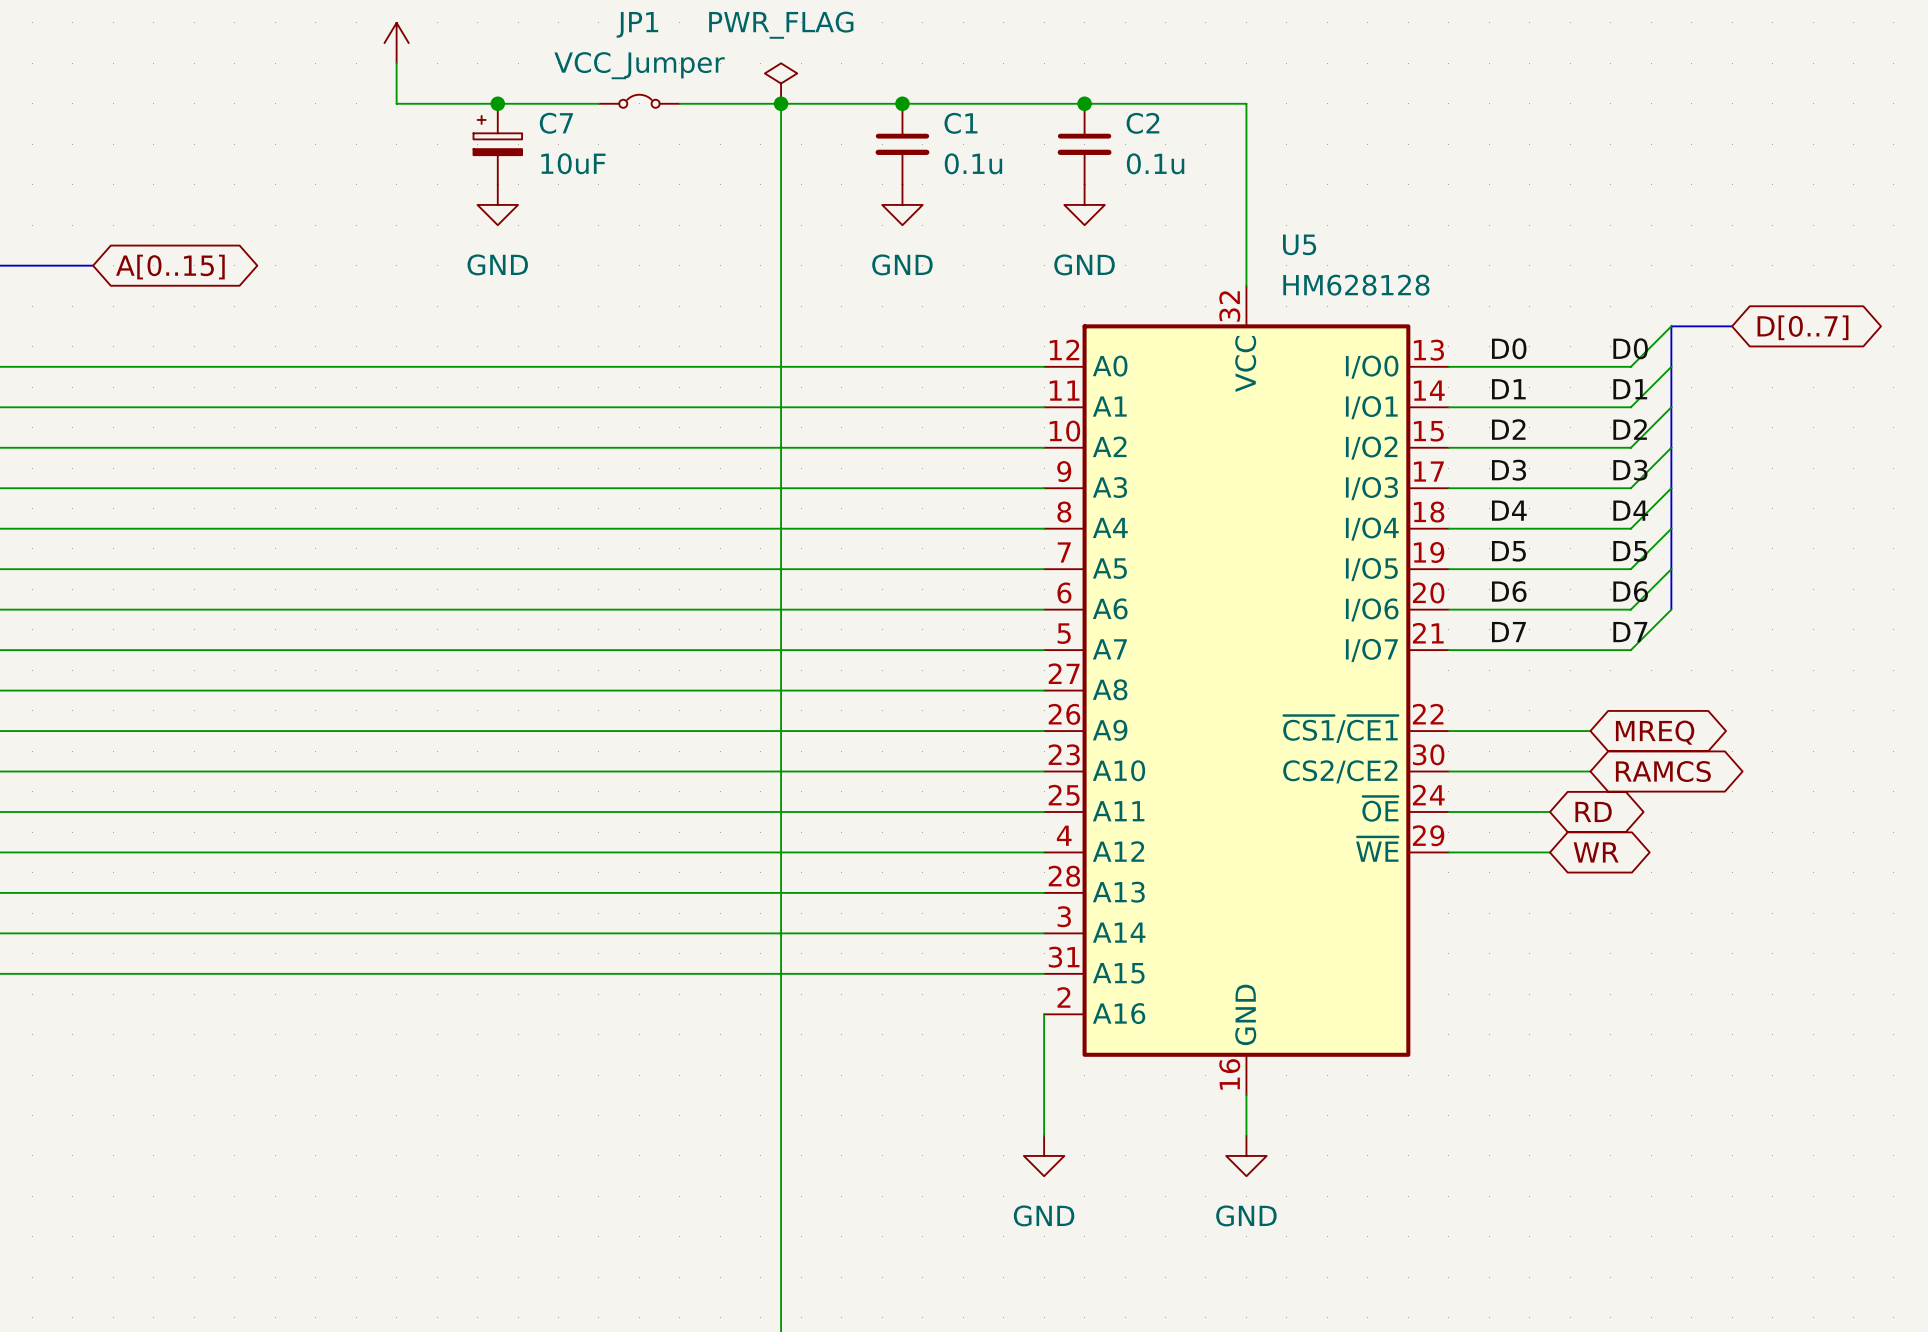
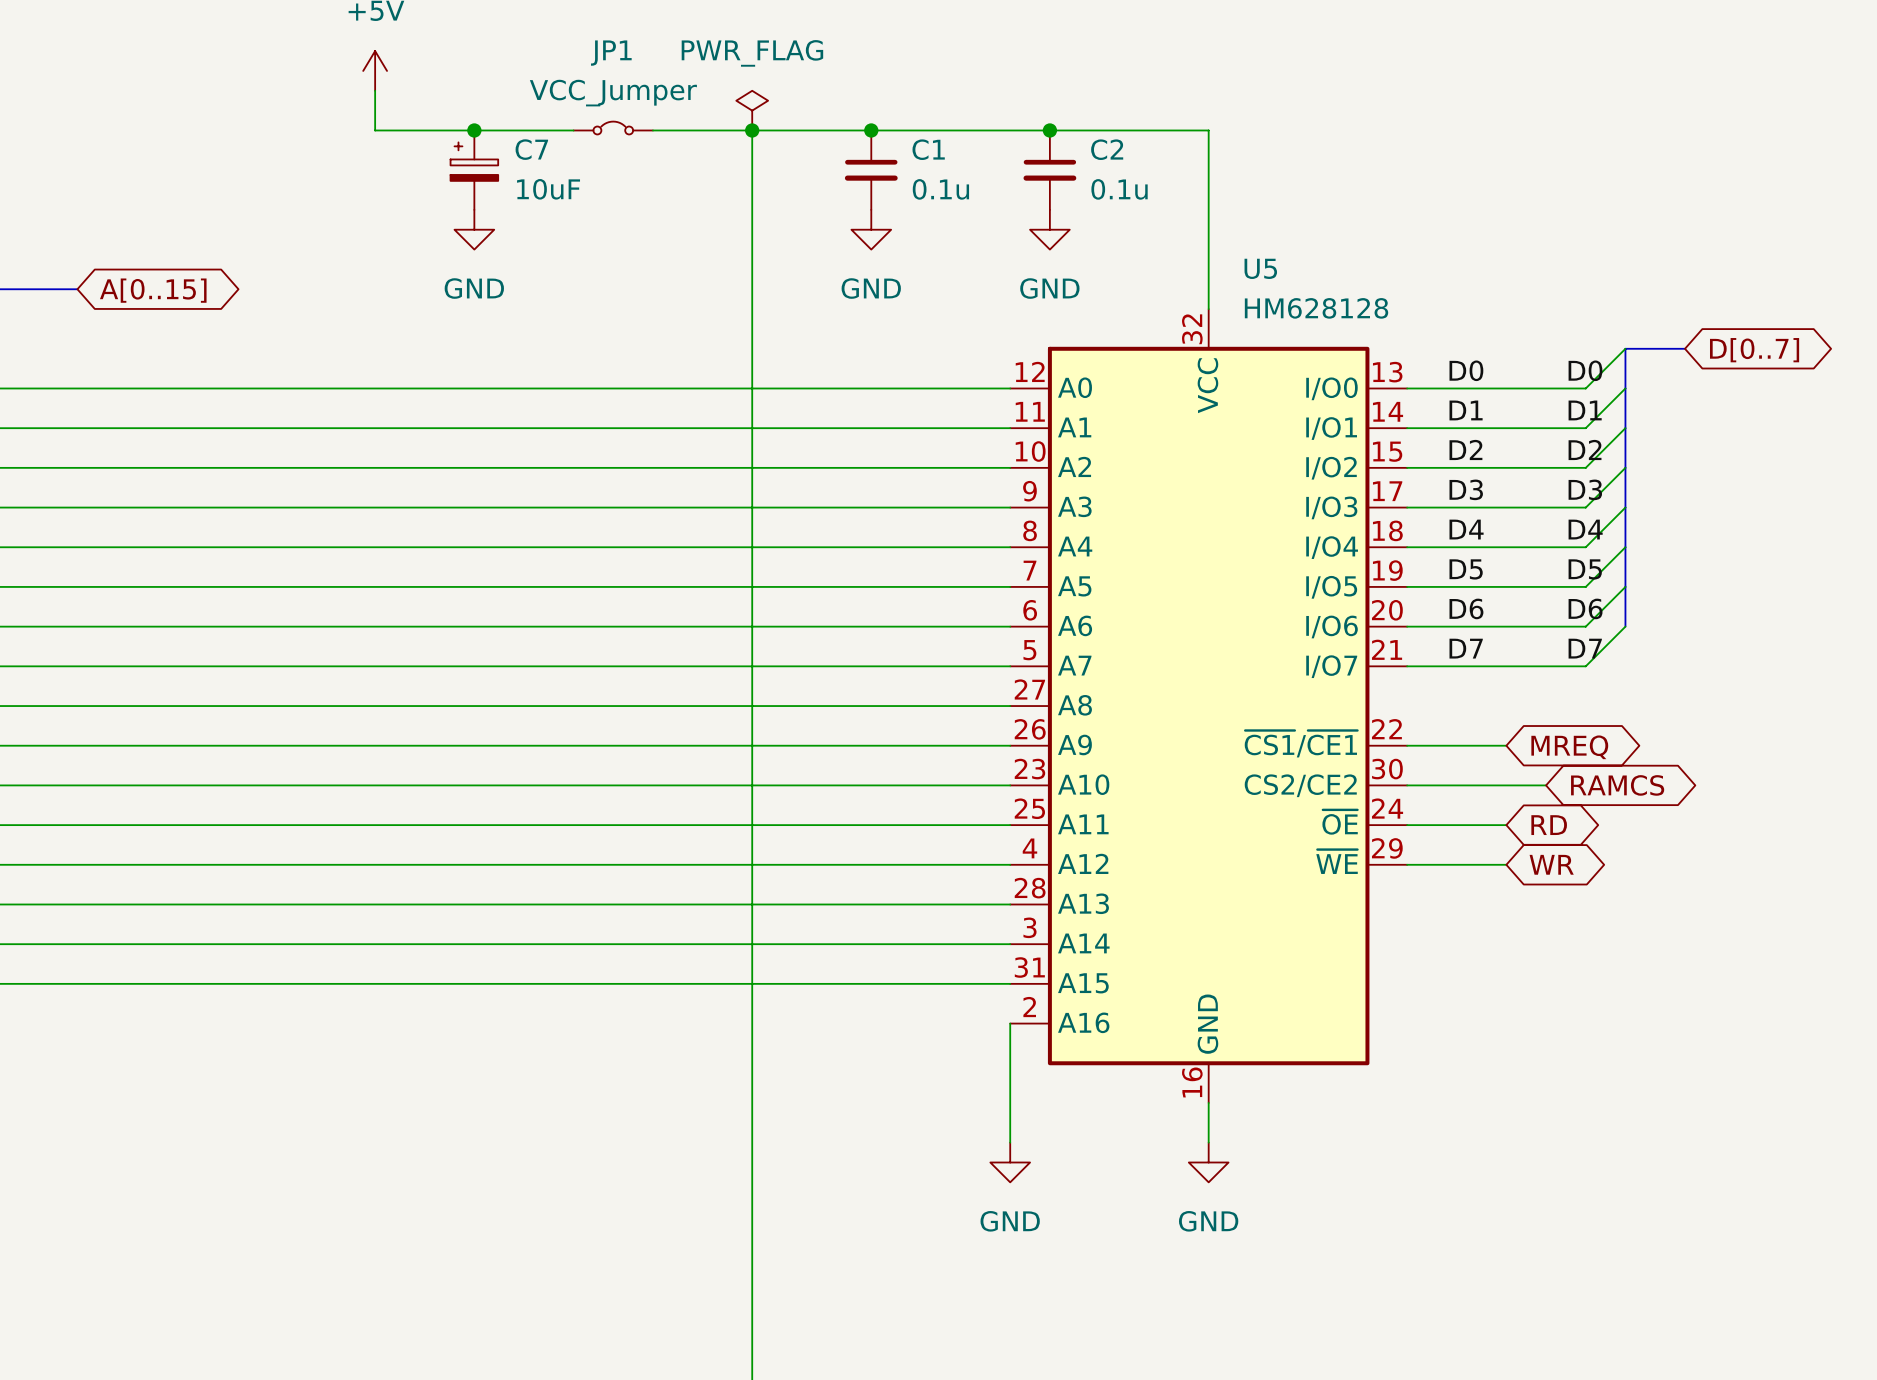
wire: (1549, 731) (1590, 731) -> none
global label position: MREQ (1655, 732) -> MREQ (1569, 747)

